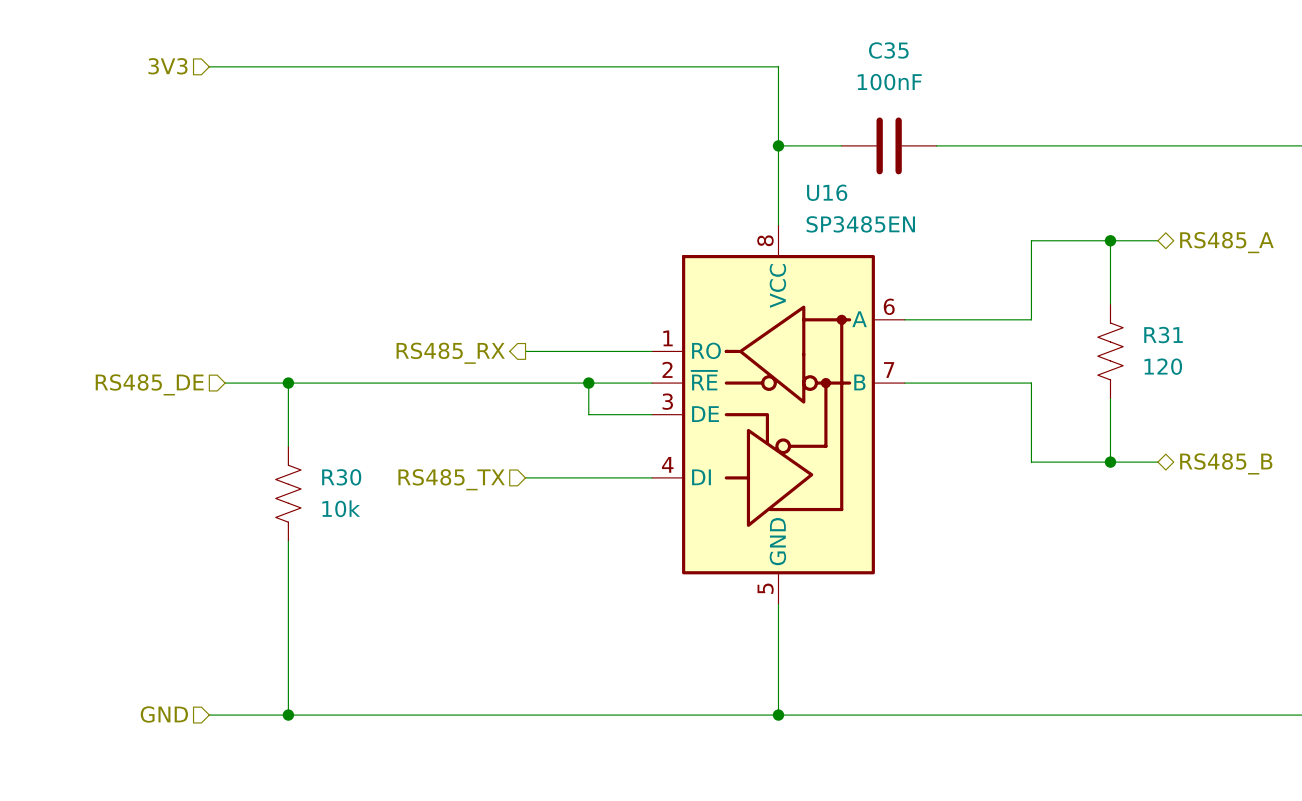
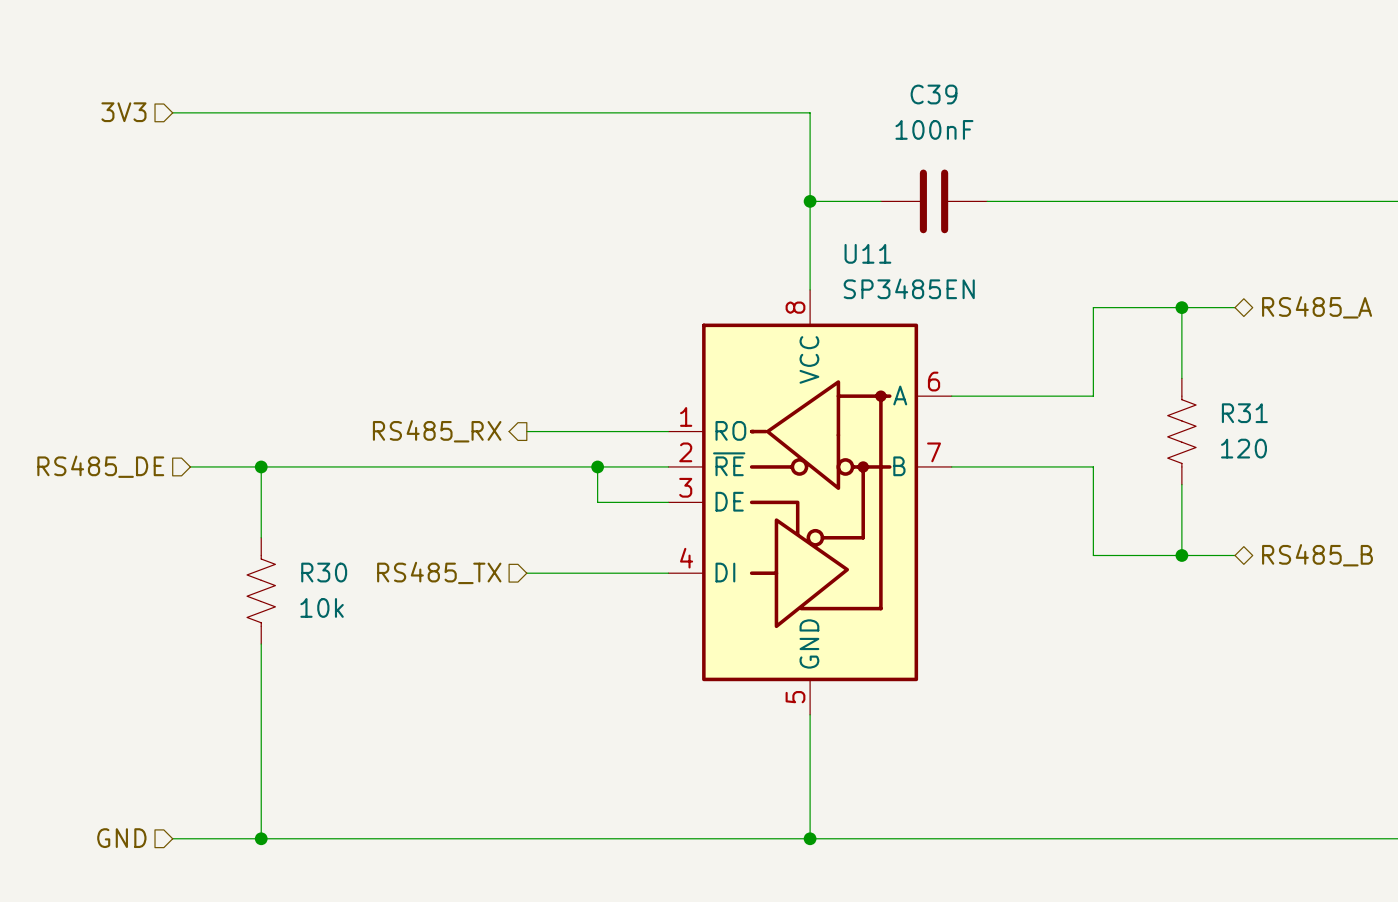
C35 name: C35 (888, 50) -> C39 (934, 94)
U16 name: U16 (827, 192) -> U11 (867, 253)

